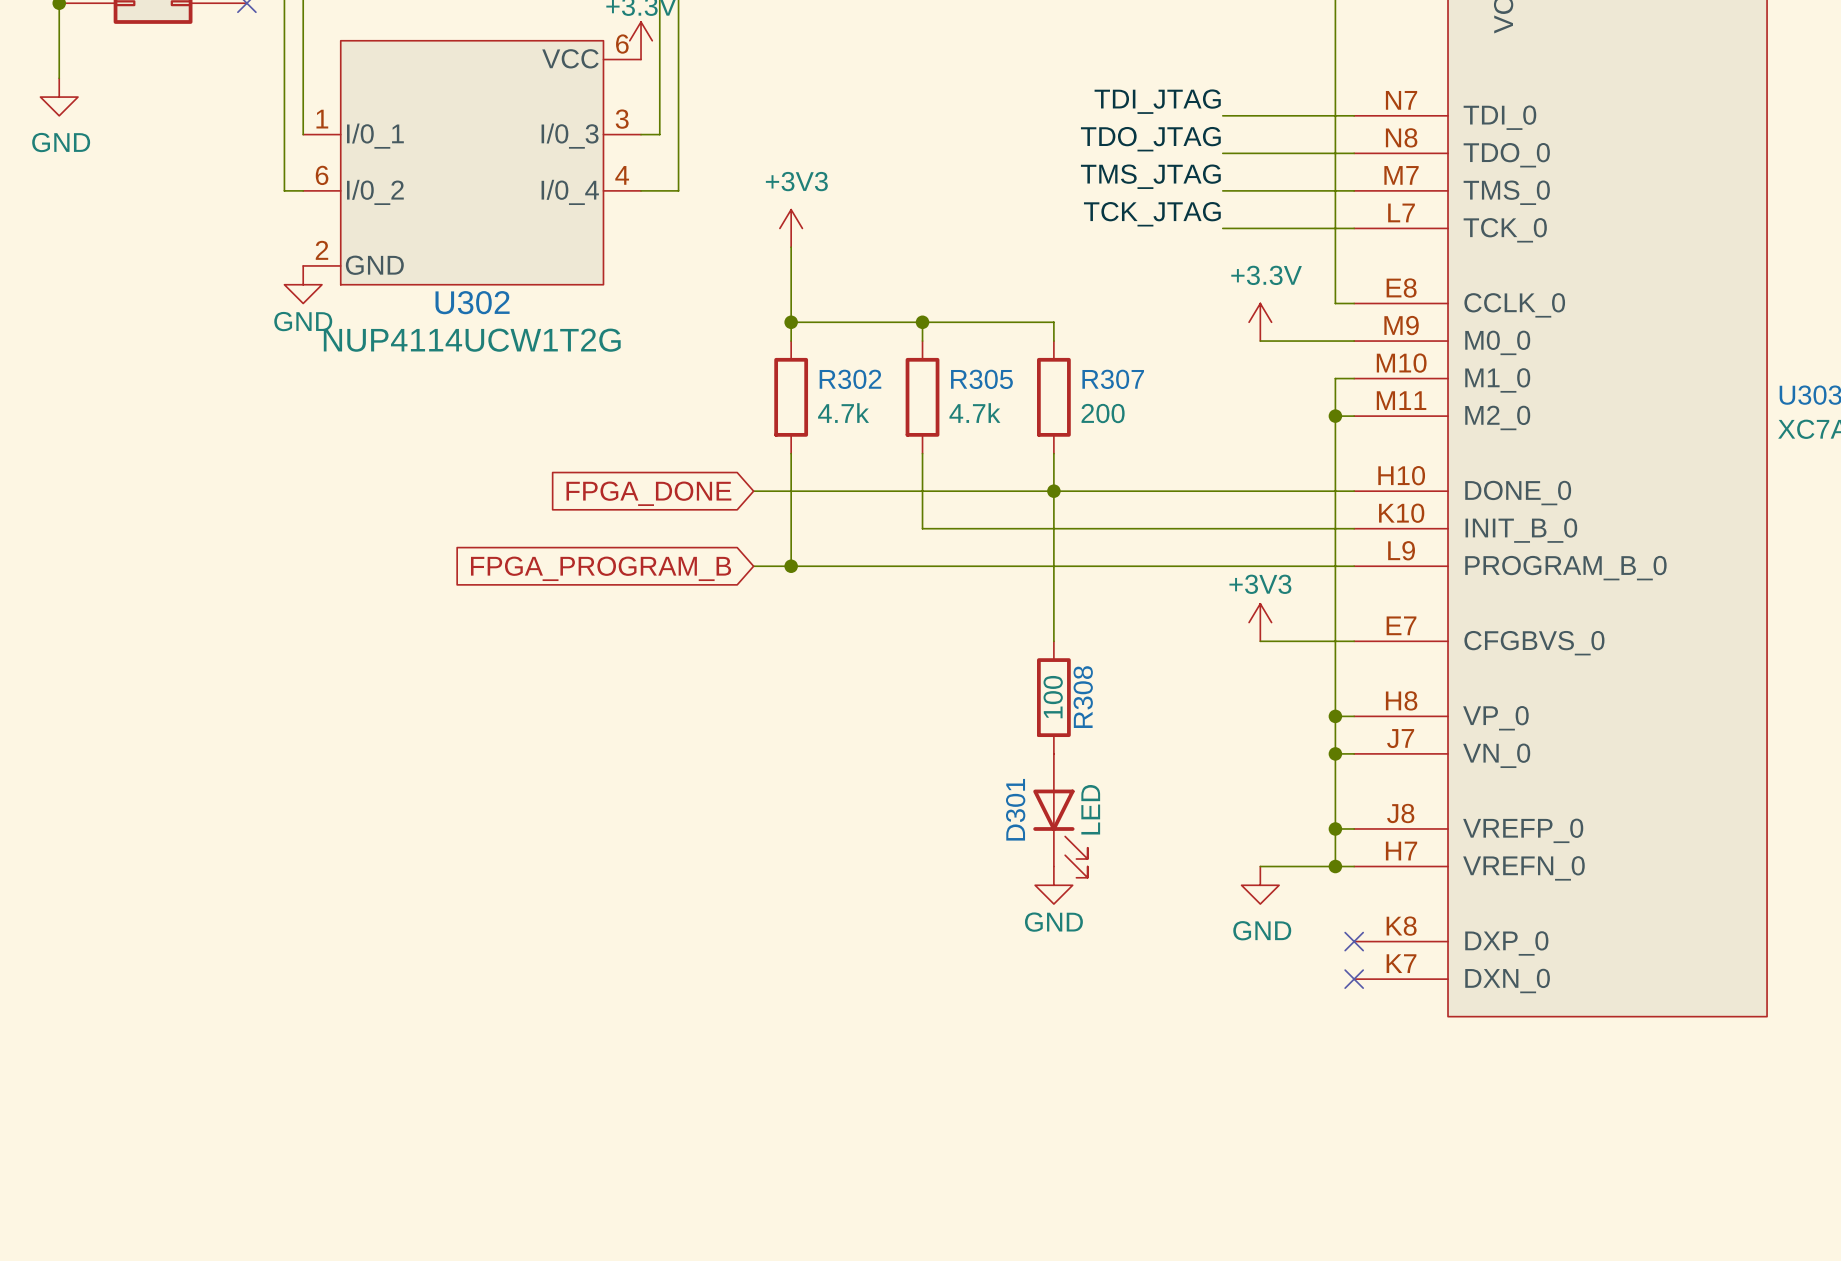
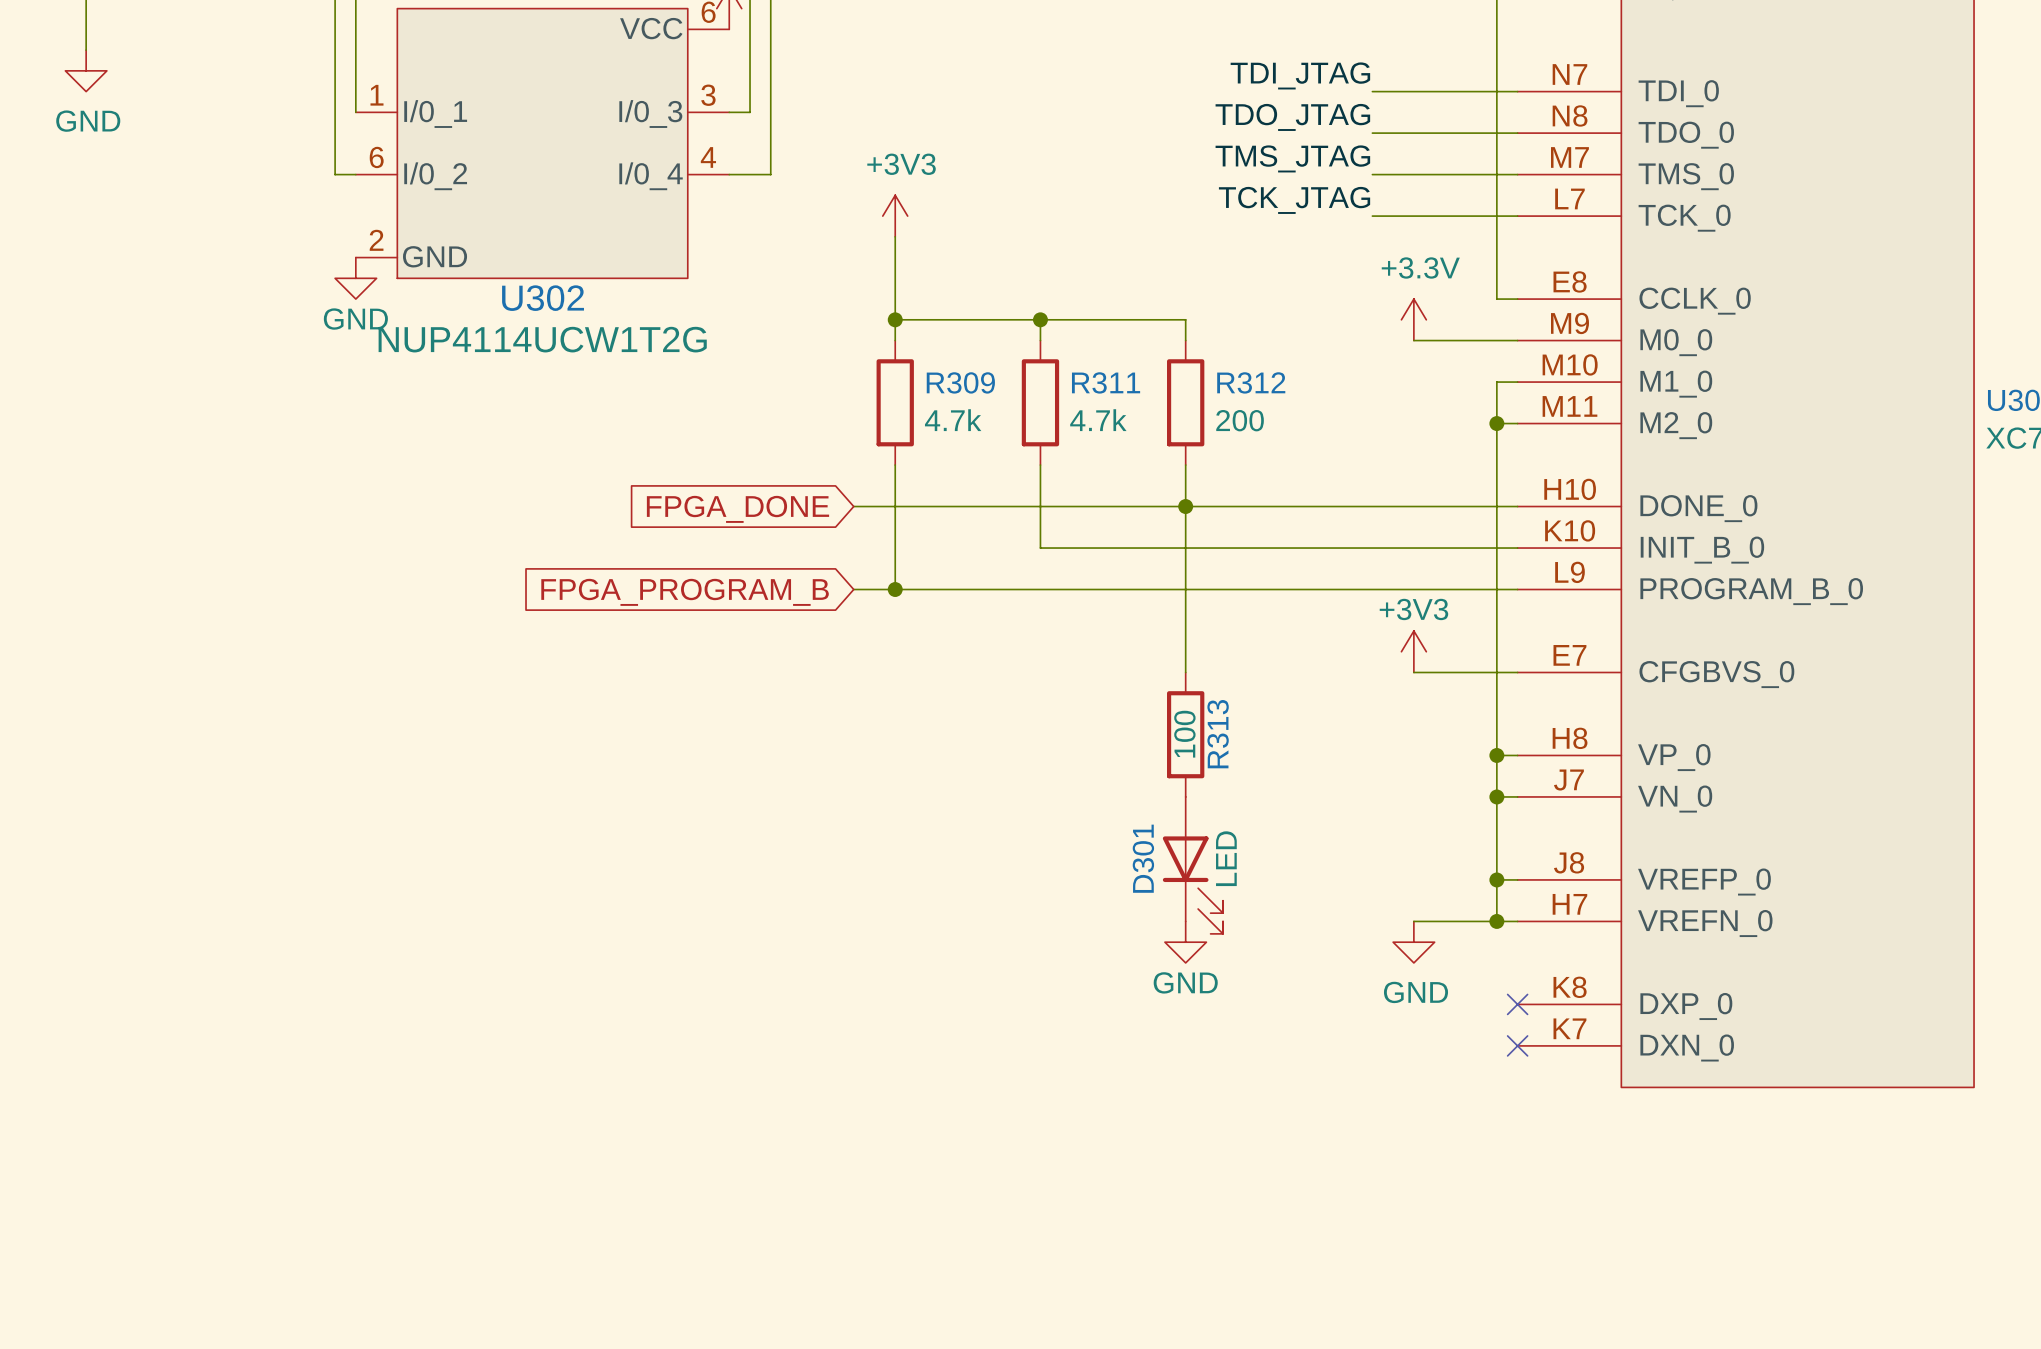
R302 name: R302 (850, 379) -> R309 (960, 382)
R305 name: R305 (981, 379) -> R311 (1106, 382)
R307 name: R307 (1113, 379) -> R312 (1251, 382)
R308 name: R308 (1083, 697) -> R313 (1218, 734)

